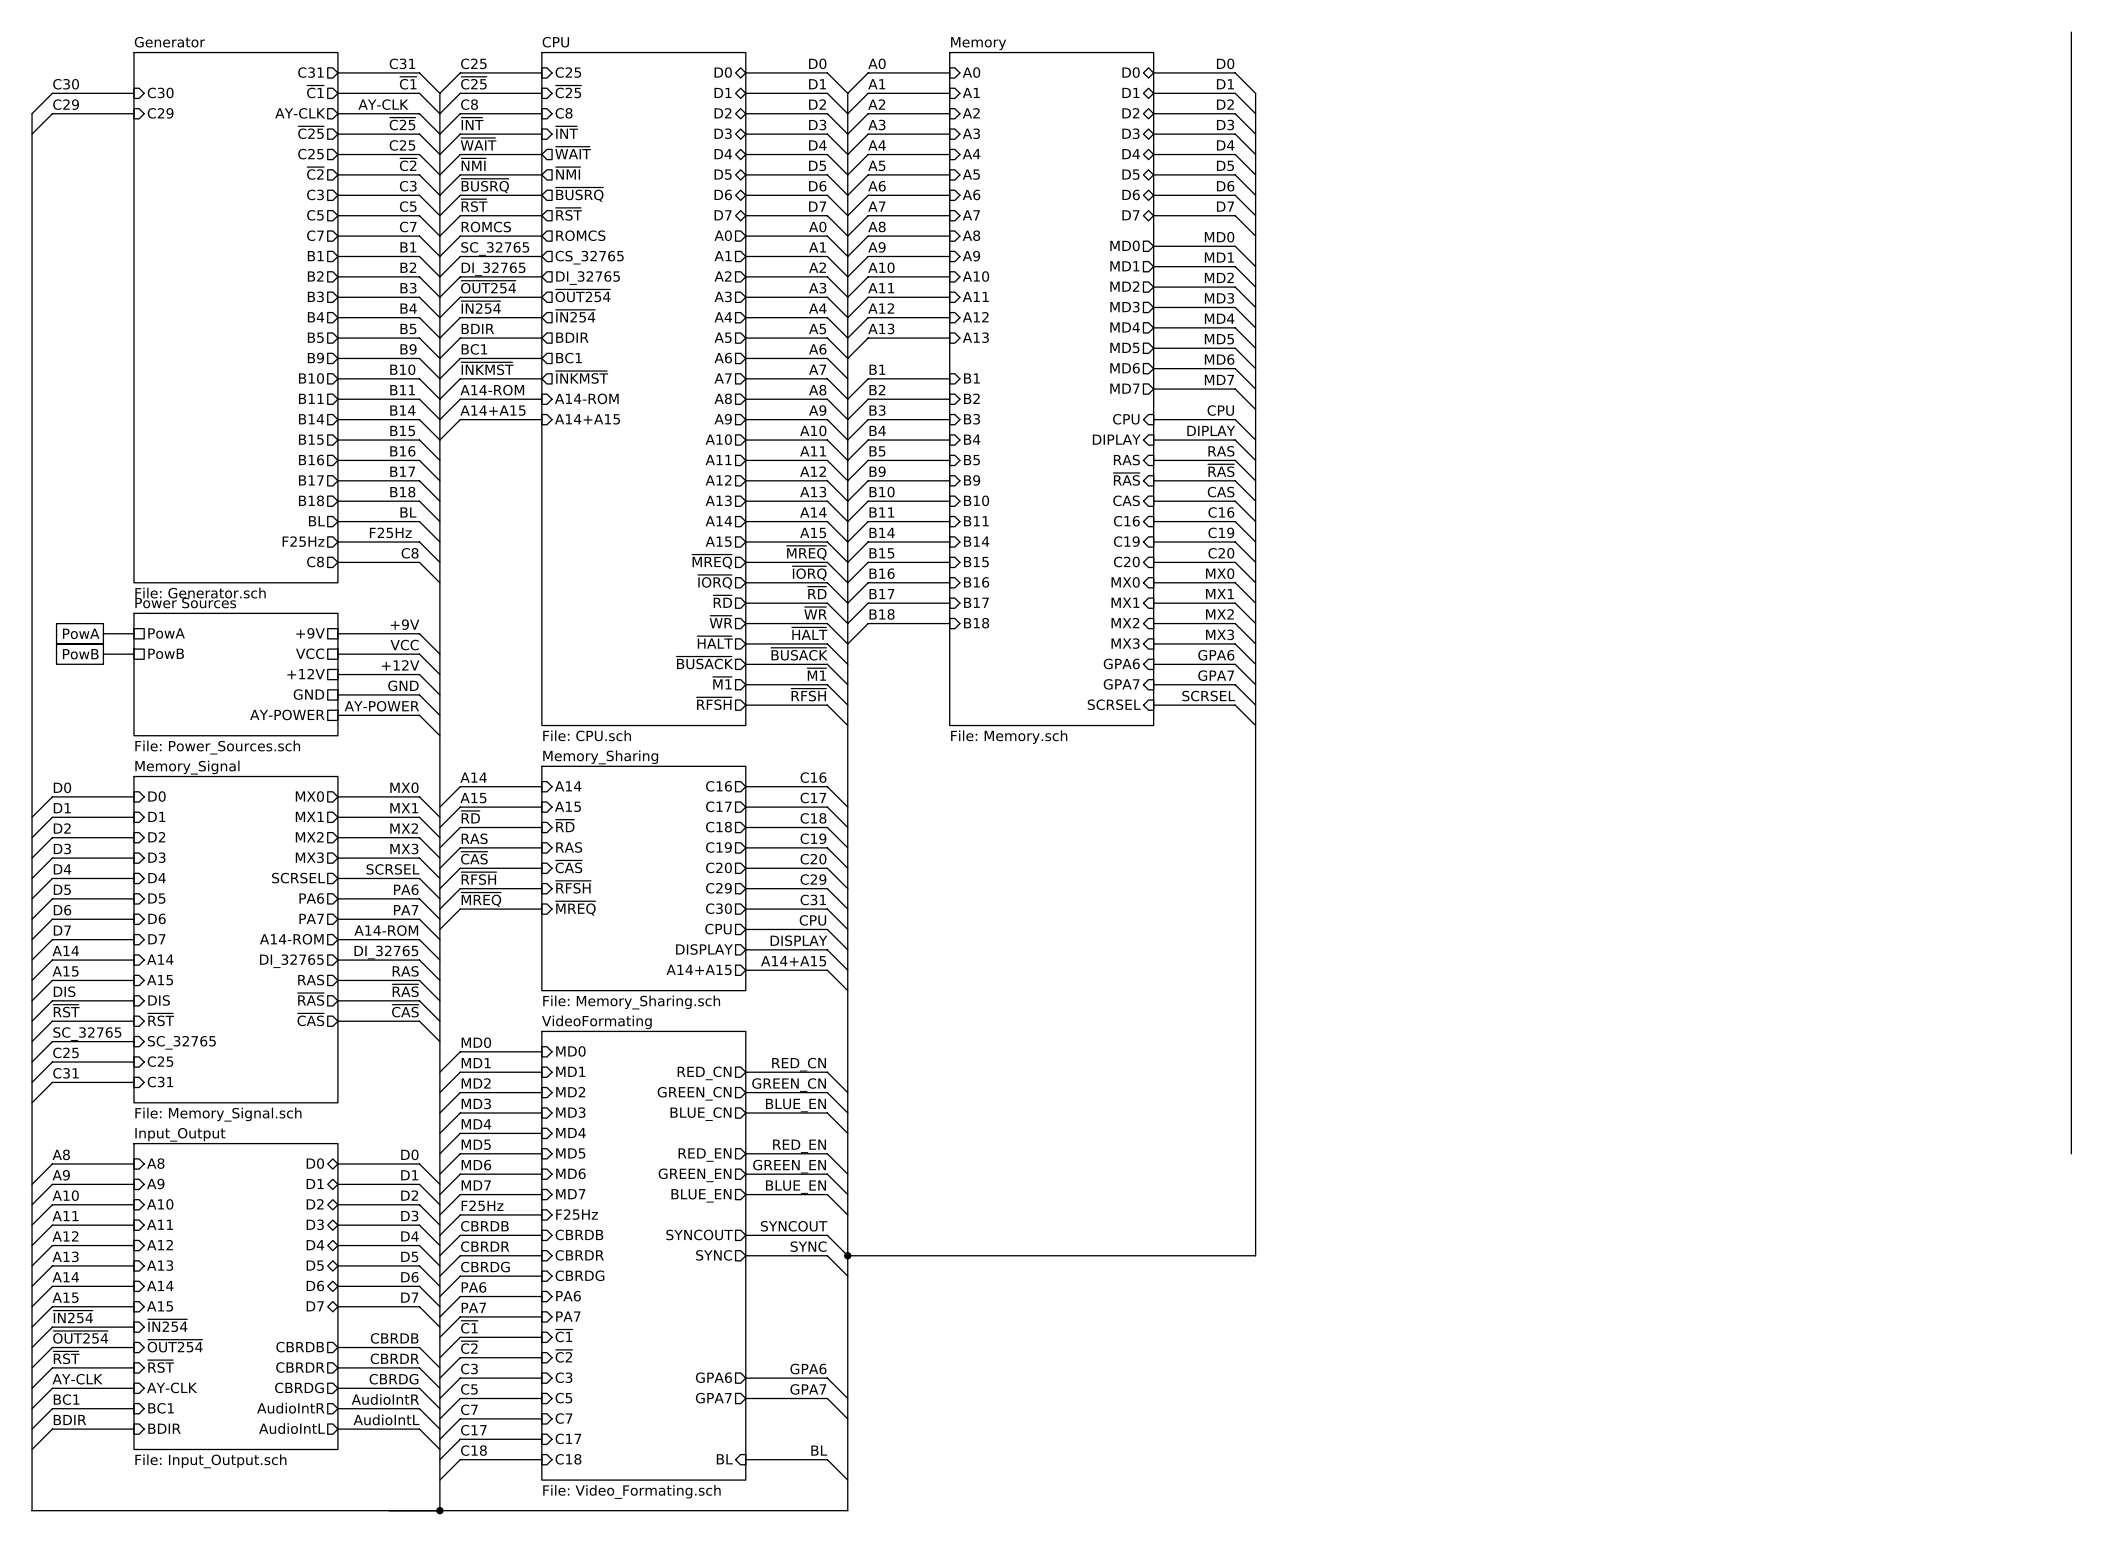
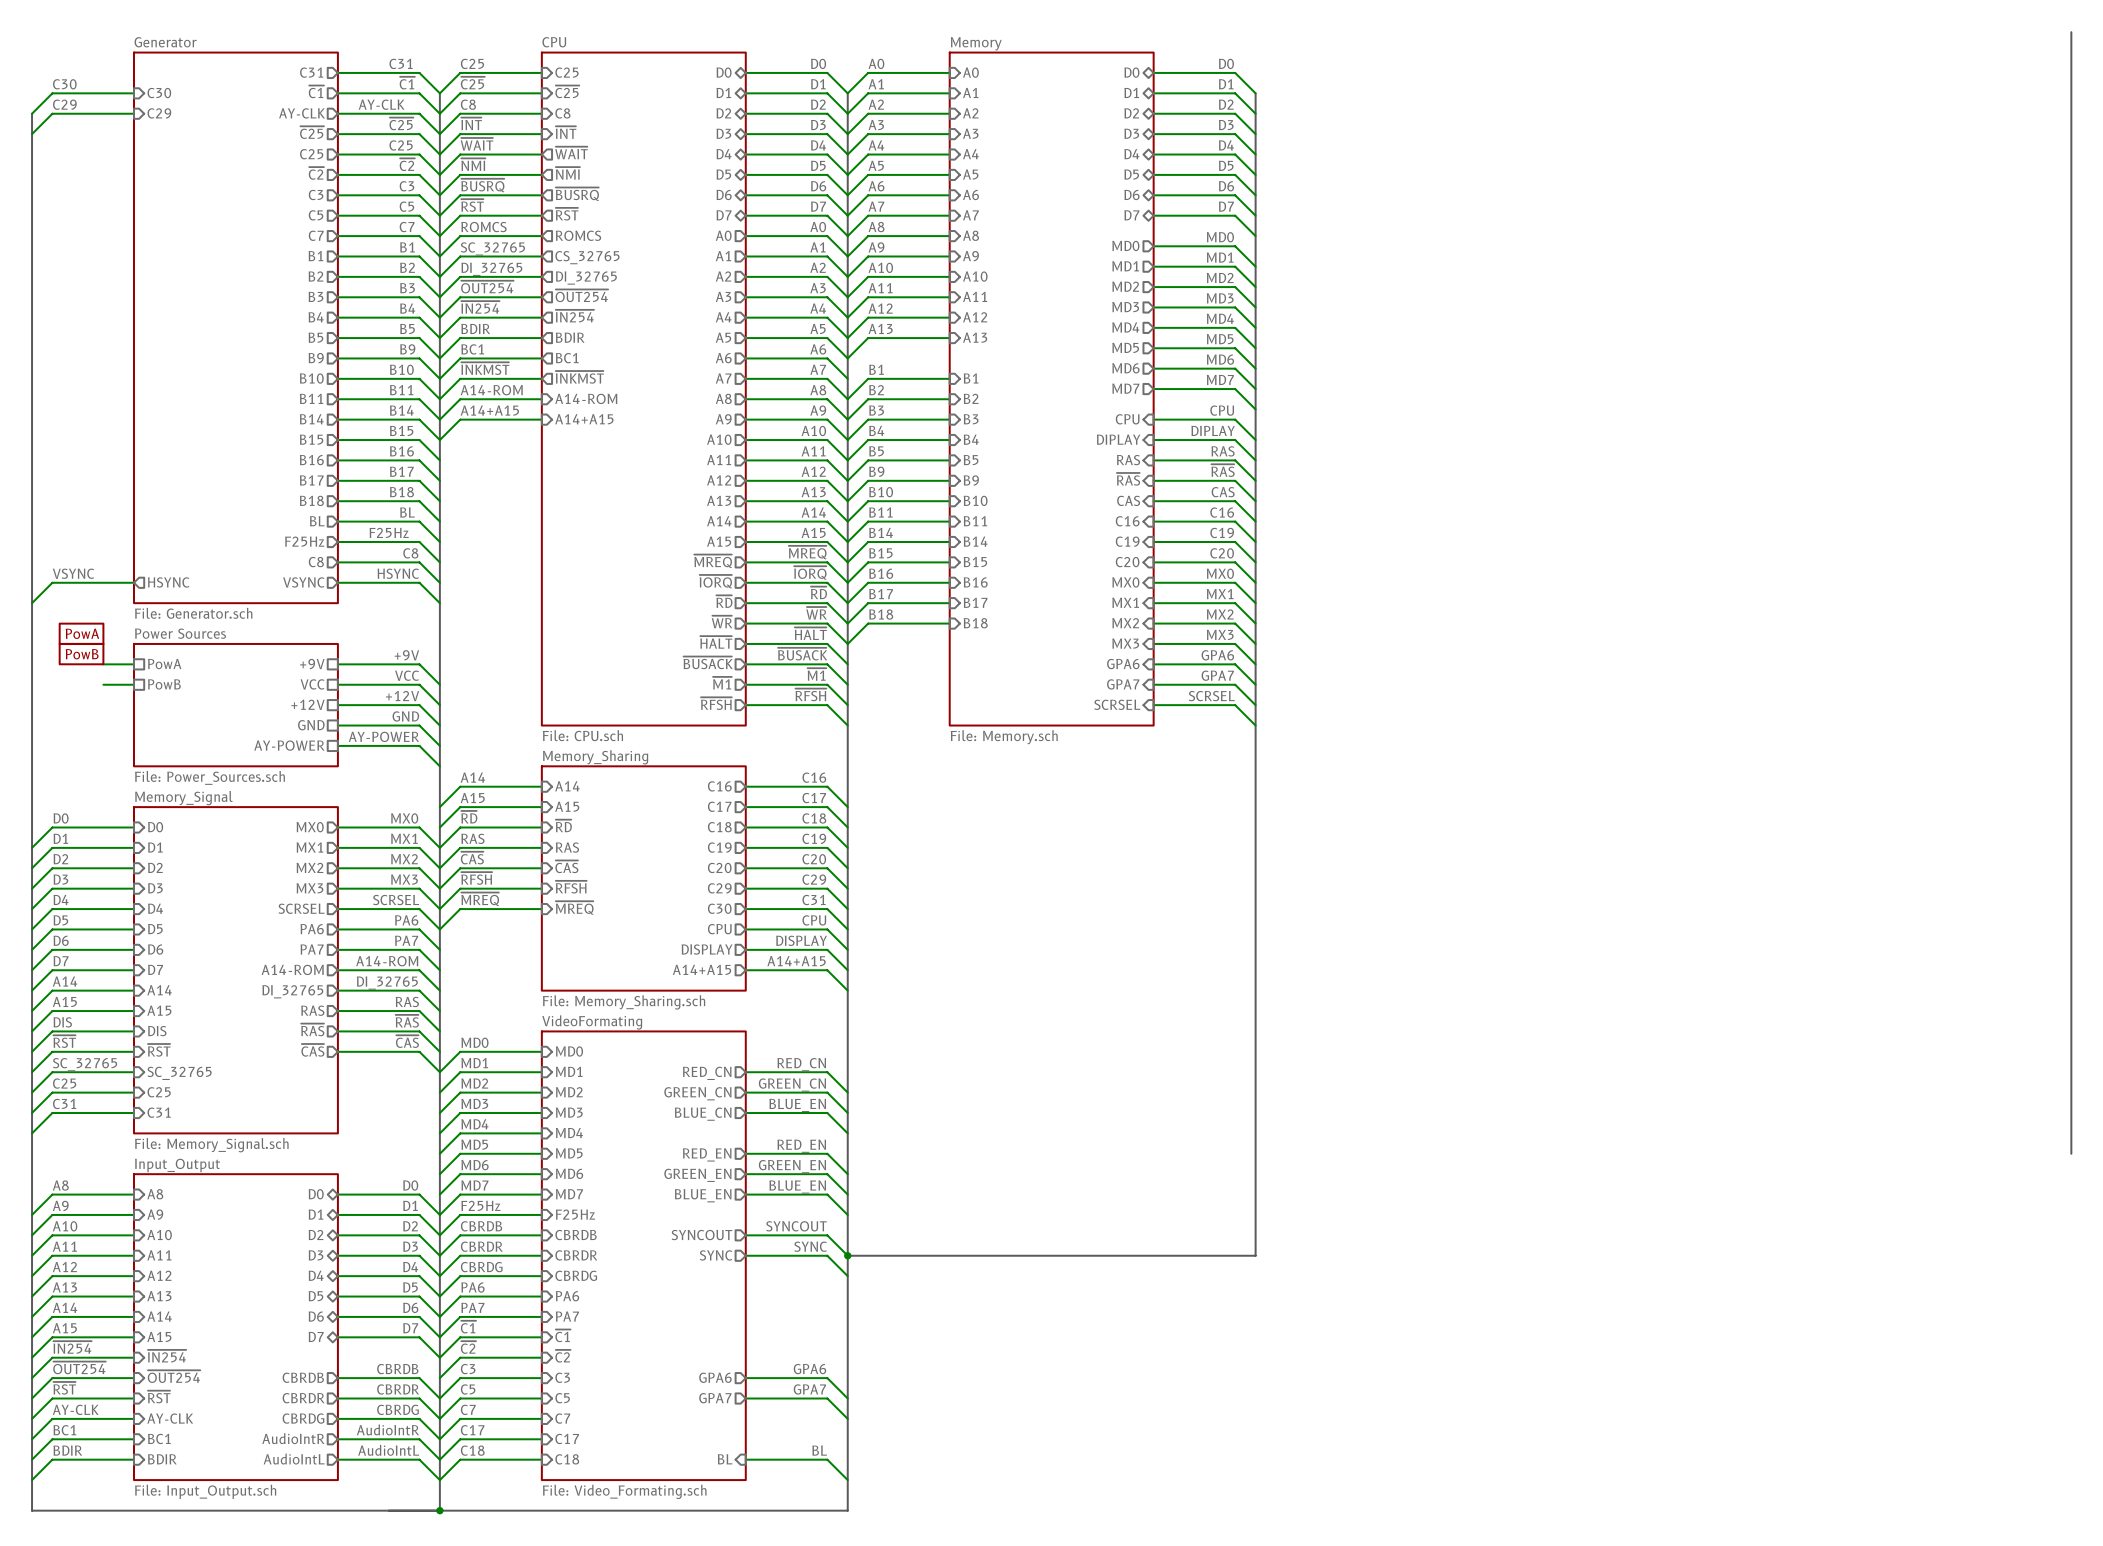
sheet Generator: File: Generator.sch (235, 317) -> none
sheet Generator: none -> File: Generator.sch (235, 327)
label: none -> VSYNC (73, 573)
label: none -> HSYNC (398, 573)
wire: none -> (133, 582) (52, 582) (32, 603)
sheet pin: none -> HSYNC (168, 582)
hierarchical label: none -> VSYNC (303, 582)
wire: none -> (337, 582) (419, 582) (439, 603)
label position: +9V (405, 624) -> +9V (406, 655)
wire: (103, 633) (133, 633) -> (103, 664) (133, 664)
sheet pin position: PowA (166, 633) -> PowA (164, 664)
sheet pin position: +9V (310, 633) -> +9V (312, 664)
wire: (337, 633) (419, 633) (439, 654) -> (337, 664) (419, 664) (439, 684)
label position: VCC (404, 645) -> VCC (407, 675)
sheet pin position: PowB (166, 653) -> PowB (164, 684)
sheet pin position: VCC (310, 653) -> VCC (312, 684)
wire: (103, 654) (133, 654) -> (103, 684) (133, 684)
wire: (337, 654) (419, 654) (439, 674) -> (337, 684) (419, 684) (439, 705)
label position: +12V (400, 665) -> +12V (402, 696)
sheet Power Sources position: (235, 674) -> (235, 705)
sheet pin position: +12V (306, 674) -> +12V (308, 704)
wire: (337, 674) (419, 674) (439, 694) -> (337, 705) (419, 705) (439, 725)
label position: GND (403, 685) -> GND (405, 716)
sheet pin position: GND (308, 694) -> GND (311, 725)
wire: (337, 694) (419, 694) (439, 715) -> (337, 725) (419, 725) (439, 745)
label position: AY-POWER (381, 706) -> AY-POWER (383, 736)
sheet pin position: AY-POWER (287, 714) -> AY-POWER (289, 745)
wire: (337, 715) (419, 715) (439, 735) -> (337, 745) (419, 745) (439, 766)
label position: D0 (62, 787) -> D0 (61, 818)
label position: MX0 (404, 787) -> MX0 (404, 818)
wire: (133, 796) (52, 796) (32, 817) -> (133, 827) (52, 827) (32, 847)
sheet pin position: D0 (157, 796) -> D0 (155, 827)
sheet pin position: MX0 (309, 796) -> MX0 (310, 827)
wire: (337, 796) (419, 796) (439, 817) -> (337, 827) (419, 827) (439, 847)
label position: D1 (62, 808) -> D1 (60, 838)
label position: MX1 (404, 808) -> MX1 (404, 838)
sheet pin position: D1 (156, 816) -> D1 (155, 847)
sheet pin position: MX1 (309, 816) -> MX1 (309, 847)
wire: (133, 817) (52, 817) (32, 837) -> (133, 847) (52, 847) (32, 868)
wire: (337, 817) (419, 817) (439, 837) -> (337, 847) (419, 847) (439, 868)
label position: D2 (62, 828) -> D2 (60, 859)
label position: MX2 (404, 828) -> MX2 (404, 859)
wire: (133, 837) (52, 837) (32, 858) -> (133, 868) (52, 868) (32, 888)
sheet pin position: D2 (156, 837) -> D2 (155, 867)
sheet pin position: MX2 (309, 837) -> MX2 (309, 867)
wire: (337, 837) (419, 837) (439, 858) -> (337, 868) (419, 868) (439, 888)
label position: D3 (62, 848) -> D3 (60, 879)
label position: MX3 (404, 848) -> MX3 (404, 879)
sheet pin position: D3 (156, 857) -> D3 (155, 888)
sheet pin position: MX3 (309, 857) -> MX3 (309, 888)
wire: (133, 858) (52, 858) (32, 878) -> (133, 888) (52, 888) (32, 909)
wire: (337, 858) (419, 858) (439, 878) -> (337, 888) (419, 888) (439, 909)
label position: D4 (62, 869) -> D4 (61, 899)
label position: SCRSEL (392, 869) -> SCRSEL (396, 900)
wire: (133, 878) (52, 878) (32, 898) -> (133, 909) (52, 909) (32, 929)
sheet pin position: D4 (157, 878) -> D4 (155, 908)
sheet pin position: SCRSEL (298, 878) -> SCRSEL (301, 908)
wire: (337, 878) (419, 878) (439, 898) -> (337, 909) (419, 909) (439, 929)
label position: D5 (62, 889) -> D5 (60, 920)
label position: PA6 (406, 889) -> PA6 (406, 920)
wire: (133, 898) (52, 898) (32, 919) -> (133, 929) (52, 929) (32, 949)
sheet pin position: D5 (156, 898) -> D5 (155, 929)
sheet pin position: PA6 (311, 898) -> PA6 (312, 929)
wire: (337, 898) (419, 898) (439, 919) -> (337, 929) (419, 929) (439, 949)
label position: D6 (62, 910) -> D6 (61, 940)
label position: PA7 (406, 910) -> PA7 (406, 940)
sheet pin position: D6 (157, 918) -> D6 (155, 949)
sheet pin position: PA7 (311, 918) -> PA7 (312, 949)
wire: (133, 919) (52, 919) (32, 939) -> (133, 949) (52, 949) (32, 970)
wire: (337, 919) (419, 919) (439, 939) -> (337, 949) (419, 949) (439, 970)
label position: D7 (62, 930) -> D7 (61, 961)
label position: A14-ROM (386, 930) -> A14-ROM (387, 961)
wire: (133, 939) (52, 939) (32, 960) -> (133, 970) (52, 970) (32, 990)
sheet pin position: D7 (156, 939) -> D7 (155, 969)
sheet Memory_Signal position: (235, 939) -> (235, 970)
sheet pin position: A14-ROM (291, 939) -> A14-ROM (292, 969)
wire: (337, 939) (419, 939) (439, 960) -> (337, 970) (419, 970) (439, 990)
label position: A14 (65, 950) -> A14 (65, 981)
label position: DI_32765 (386, 952) -> DI_32765 (387, 983)
sheet pin position: A14 (160, 959) -> A14 (159, 990)
wire: (133, 960) (52, 960) (32, 980) -> (133, 990) (52, 990) (32, 1011)
wire: (337, 960) (419, 960) (439, 980) -> (337, 990) (419, 990) (439, 1011)
sheet pin position: DI_32765 (291, 961) -> DI_32765 (292, 991)
label position: A15 (65, 971) -> A15 (64, 1001)
label position: RAS (405, 971) -> RAS (407, 1001)
wire: (133, 980) (52, 980) (32, 1000) -> (133, 1011) (52, 1011) (32, 1031)
sheet pin position: A15 (160, 980) -> A15 (159, 1010)
sheet pin position: RAS (311, 980) -> RAS (312, 1010)
wire: (337, 980) (419, 980) (439, 1000) -> (337, 1011) (419, 1011) (439, 1031)
label position: ~{RAS} (405, 990) -> ~{RAS} (407, 1021)
label position: DIS (64, 991) -> DIS (62, 1022)
sheet pin position: ~{RAS} (311, 999) -> ~{RAS} (312, 1029)
wire: (133, 1000) (52, 1000) (32, 1021) -> (133, 1031) (52, 1031) (32, 1051)
sheet pin position: DIS (159, 1000) -> DIS (157, 1031)
wire: (337, 1000) (419, 1000) (439, 1021) -> (337, 1031) (419, 1031) (439, 1051)
label position: ~{RST} (66, 1011) -> ~{RST} (64, 1041)
label position: ~{CAS} (405, 1011) -> ~{CAS} (407, 1041)
sheet pin position: ~{RST} (161, 1019) -> ~{RST} (159, 1050)
sheet pin position: ~{CAS} (310, 1019) -> ~{CAS} (312, 1050)
wire: (133, 1021) (52, 1021) (32, 1041) -> (133, 1051) (52, 1051) (32, 1072)
wire: (337, 1021) (419, 1021) (439, 1041) -> (337, 1051) (419, 1051) (439, 1072)
label position: SC_32765 (87, 1034) -> SC_32765 (85, 1064)
wire: (133, 1041) (52, 1041) (32, 1062) -> (133, 1072) (52, 1072) (32, 1092)
sheet pin position: SC_32765 (181, 1042) -> SC_32765 (179, 1073)
label position: C25 (65, 1052) -> C25 (64, 1083)
sheet pin position: C25 (160, 1061) -> C25 (159, 1092)
wire: (133, 1062) (52, 1062) (32, 1082) -> (133, 1092) (52, 1092) (32, 1113)
label position: C31 (65, 1073) -> C31 (64, 1103)
wire: (133, 1082) (52, 1082) (32, 1102) -> (133, 1113) (52, 1113) (32, 1133)
sheet pin position: C31 (160, 1082) -> C31 (159, 1112)
label position: A8 (61, 1154) -> A8 (60, 1185)
label position: D0 (409, 1154) -> D0 (410, 1185)
wire: (133, 1163) (52, 1163) (32, 1184) -> (133, 1194) (52, 1194) (32, 1214)
sheet pin position: A8 (155, 1163) -> A8 (155, 1194)
sheet pin position: D0 (315, 1163) -> D0 (316, 1194)
wire: (337, 1163) (419, 1163) (439, 1184) -> (337, 1194) (419, 1194) (439, 1214)
label position: A9 (61, 1175) -> A9 (60, 1205)
label position: D1 (409, 1175) -> D1 (410, 1205)
sheet pin position: D1 (315, 1183) -> D1 (315, 1214)
wire: (133, 1184) (52, 1184) (32, 1204) -> (133, 1214) (52, 1214) (32, 1235)
sheet pin position: A9 (155, 1184) -> A9 (155, 1214)
wire: (337, 1184) (419, 1184) (439, 1204) -> (337, 1214) (419, 1214) (439, 1235)
label position: A10 (65, 1195) -> A10 (65, 1226)
label position: D2 (409, 1195) -> D2 (410, 1226)
wire: (133, 1204) (52, 1204) (32, 1225) -> (133, 1235) (52, 1235) (32, 1255)
sheet pin position: A10 (160, 1204) -> A10 (159, 1235)
sheet pin position: D2 (315, 1204) -> D2 (316, 1234)
wire: (337, 1204) (419, 1204) (439, 1225) -> (337, 1235) (419, 1235) (439, 1255)
label position: A11 (65, 1216) -> A11 (64, 1246)
label position: D3 (409, 1216) -> D3 (410, 1246)
sheet pin position: A11 (160, 1224) -> A11 (159, 1255)
sheet pin position: D3 (315, 1224) -> D3 (316, 1255)
wire: (133, 1225) (52, 1225) (32, 1245) -> (133, 1255) (52, 1255) (32, 1276)
wire: (337, 1225) (419, 1225) (439, 1245) -> (337, 1255) (419, 1255) (439, 1276)
label position: A12 (65, 1236) -> A12 (64, 1267)
label position: D4 (409, 1236) -> D4 (410, 1267)
wire: (133, 1245) (52, 1245) (32, 1265) -> (133, 1276) (52, 1276) (32, 1296)
sheet pin position: A12 (159, 1245) -> A12 (159, 1275)
sheet pin position: D4 (315, 1245) -> D4 (316, 1275)
wire: (337, 1245) (419, 1245) (439, 1265) -> (337, 1276) (419, 1276) (439, 1296)
label position: A13 (65, 1256) -> A13 (64, 1287)
label position: D5 (409, 1256) -> D5 (410, 1287)
wire: (133, 1265) (52, 1265) (32, 1286) -> (133, 1296) (52, 1296) (32, 1316)
sheet pin position: A13 (160, 1265) -> A13 (159, 1296)
sheet pin position: D5 (315, 1265) -> D5 (315, 1296)
wire: (337, 1265) (419, 1265) (439, 1286) -> (337, 1296) (419, 1296) (439, 1316)
label position: A14 (65, 1277) -> A14 (65, 1307)
label position: D6 (409, 1277) -> D6 (410, 1307)
sheet pin position: A14 (160, 1285) -> A14 (159, 1316)
sheet pin position: D6 (315, 1285) -> D6 (316, 1316)
wire: (133, 1286) (52, 1286) (32, 1306) -> (133, 1316) (52, 1316) (32, 1337)
wire: (337, 1286) (419, 1286) (439, 1306) -> (337, 1316) (419, 1316) (439, 1337)
sheet Input_Output position: (235, 1296) -> (235, 1327)
label position: A15 (65, 1297) -> A15 (64, 1328)
label position: D7 (409, 1297) -> D7 (410, 1328)
wire: (133, 1306) (52, 1306) (32, 1327) -> (133, 1337) (52, 1337) (32, 1357)
sheet pin position: A15 (160, 1306) -> A15 (159, 1336)
sheet pin position: D7 (315, 1306) -> D7 (316, 1336)
wire: (337, 1306) (419, 1306) (439, 1327) -> (337, 1337) (419, 1337) (439, 1357)
label position: ~{IN254} (73, 1316) -> ~{IN254} (72, 1347)
sheet pin position: ~{IN254} (167, 1325) -> ~{IN254} (167, 1356)
wire: (133, 1327) (52, 1327) (32, 1347) -> (133, 1357) (52, 1357) (32, 1378)
label position: ~{OUT254} (80, 1337) -> ~{OUT254} (79, 1367)
label position: CBRDB (394, 1338) -> CBRDB (397, 1369)
sheet pin position: ~{OUT254} (175, 1346) -> ~{OUT254} (174, 1376)
wire: (133, 1347) (52, 1347) (32, 1367) -> (133, 1378) (52, 1378) (32, 1398)
sheet pin position: CBRDB (300, 1347) -> CBRDB (303, 1377)
wire: (337, 1347) (419, 1347) (439, 1367) -> (337, 1378) (419, 1378) (439, 1398)
label position: ~{RST} (66, 1357) -> ~{RST} (64, 1388)
label position: CBRDR (394, 1358) -> CBRDR (398, 1389)
sheet pin position: ~{RST} (161, 1366) -> ~{RST} (159, 1397)
wire: (133, 1367) (52, 1367) (32, 1388) -> (133, 1398) (52, 1398) (32, 1418)
sheet pin position: CBRDR (300, 1367) -> CBRDR (303, 1398)
wire: (337, 1367) (419, 1367) (439, 1388) -> (337, 1398) (419, 1398) (439, 1418)
label position: AY-CLK (77, 1379) -> AY-CLK (75, 1409)
label position: CBRDG (393, 1379) -> CBRDG (397, 1409)
sheet pin position: AY-CLK (172, 1387) -> AY-CLK (170, 1418)
sheet pin position: CBRDG (299, 1387) -> CBRDG (303, 1418)
wire: (133, 1388) (52, 1388) (32, 1408) -> (133, 1418) (52, 1418) (32, 1439)
wire: (337, 1388) (419, 1388) (439, 1408) -> (337, 1418) (419, 1418) (439, 1439)
label position: BC1 (66, 1399) -> BC1 (64, 1430)
label position: AudioIntR (385, 1399) -> AudioIntR (387, 1429)
wire: (133, 1408) (52, 1408) (32, 1429) -> (133, 1439) (52, 1439) (32, 1459)
sheet pin position: BC1 (161, 1408) -> BC1 (159, 1438)
sheet pin position: AudioIntR (290, 1408) -> AudioIntR (293, 1438)
wire: (337, 1408) (419, 1408) (439, 1429) -> (337, 1439) (419, 1439) (439, 1459)
label position: BDIR (70, 1419) -> BDIR (67, 1450)
label position: AudioIntL (386, 1419) -> AudioIntL (388, 1450)
sheet pin position: BDIR (164, 1428) -> BDIR (162, 1459)
sheet pin position: AudioIntL (291, 1428) -> AudioIntL (294, 1459)
wire: (133, 1429) (52, 1429) (32, 1449) -> (133, 1459) (52, 1459) (32, 1480)
wire: (337, 1429) (419, 1429) (439, 1449) -> (337, 1459) (419, 1459) (439, 1480)

